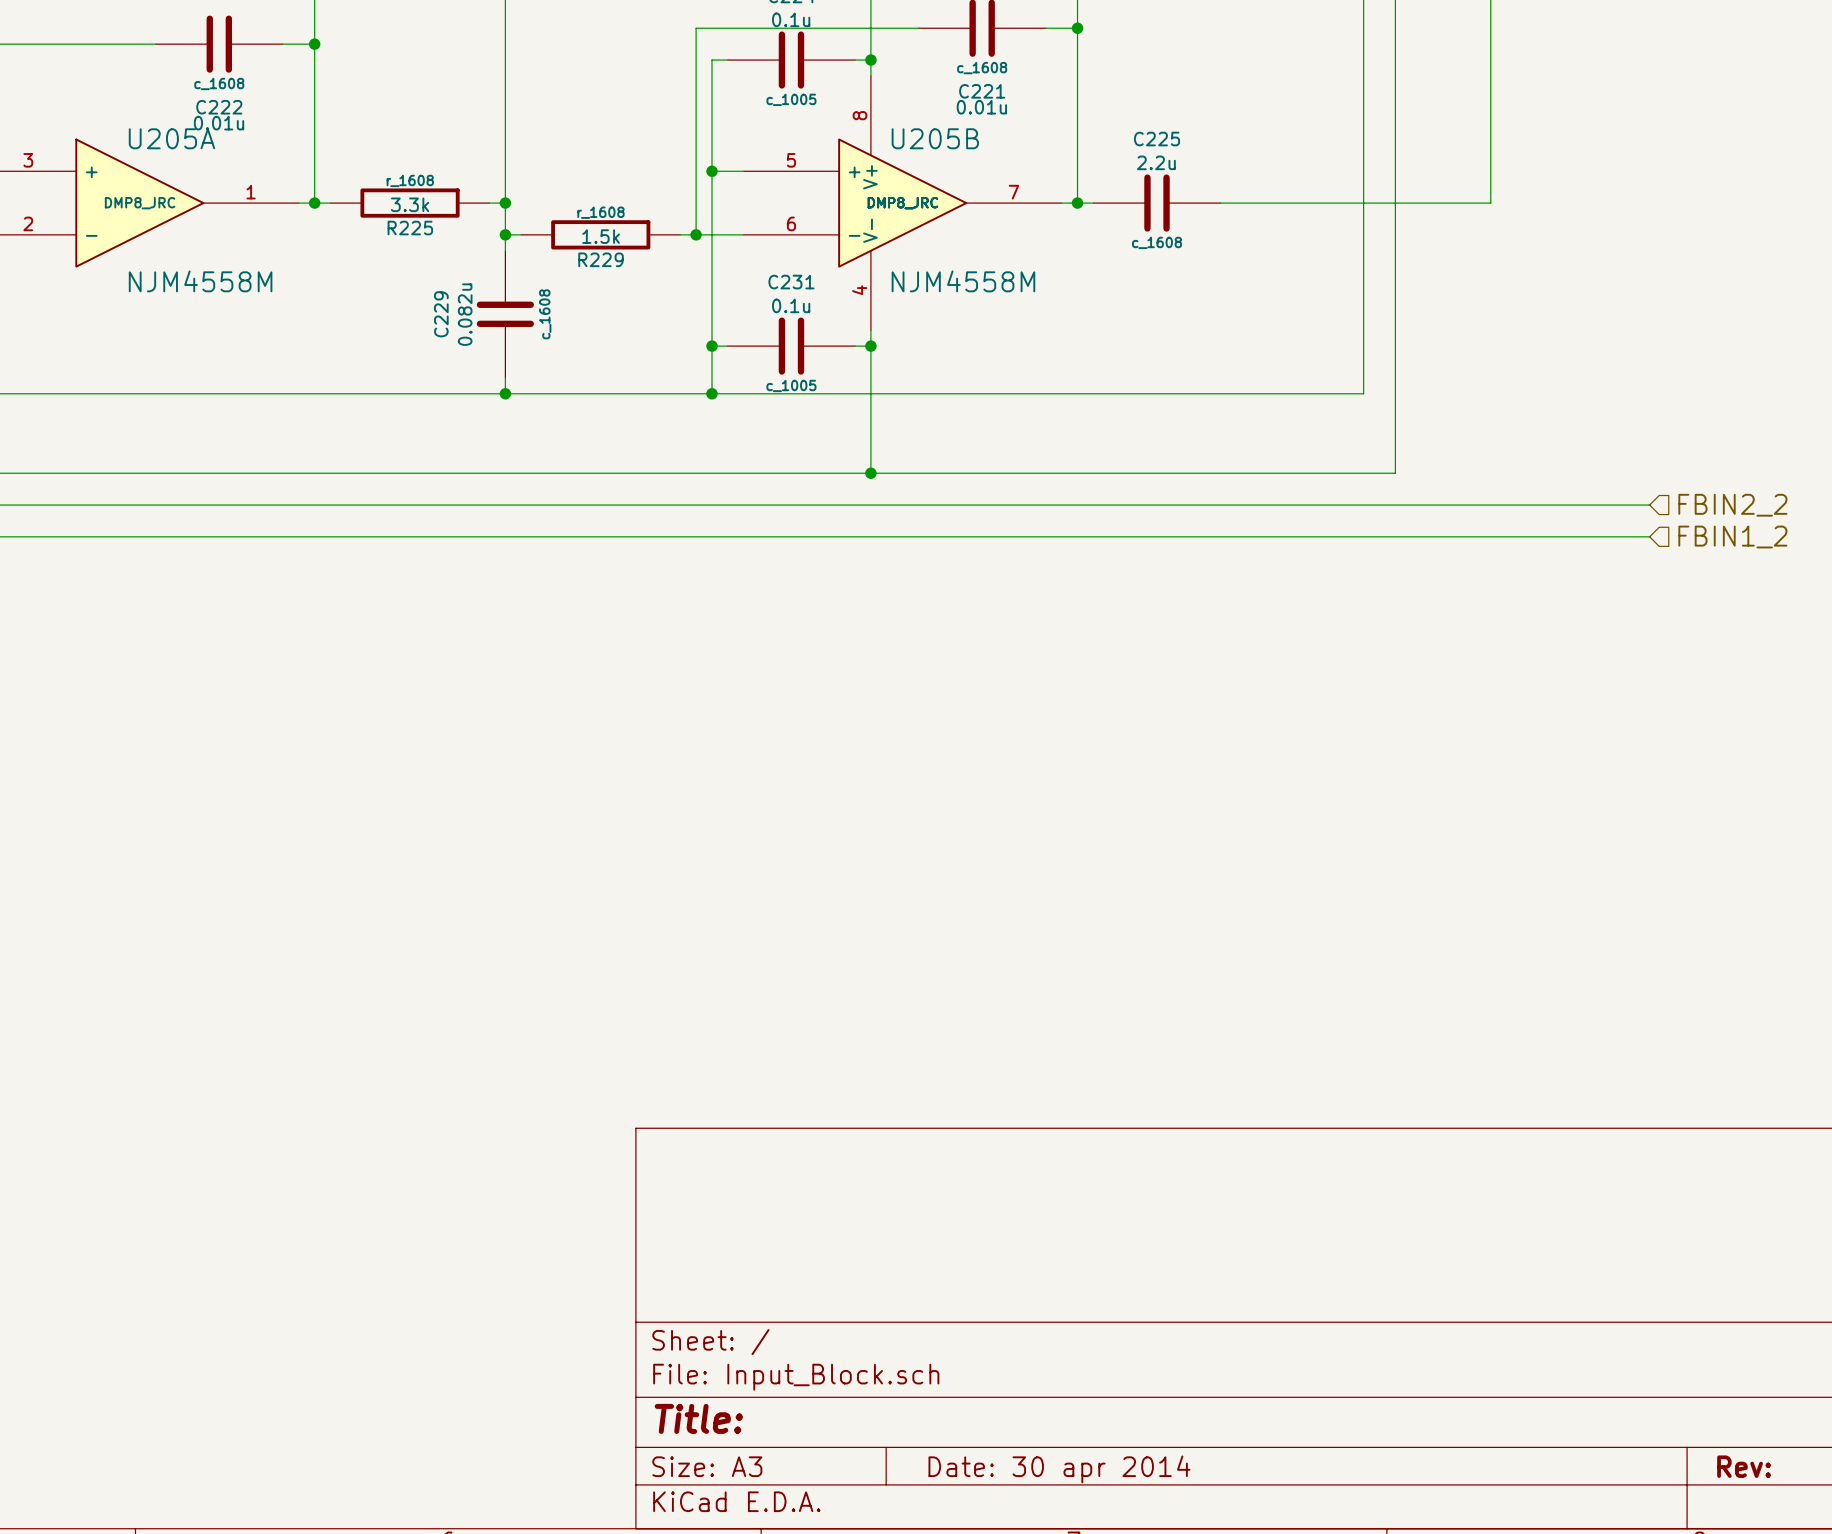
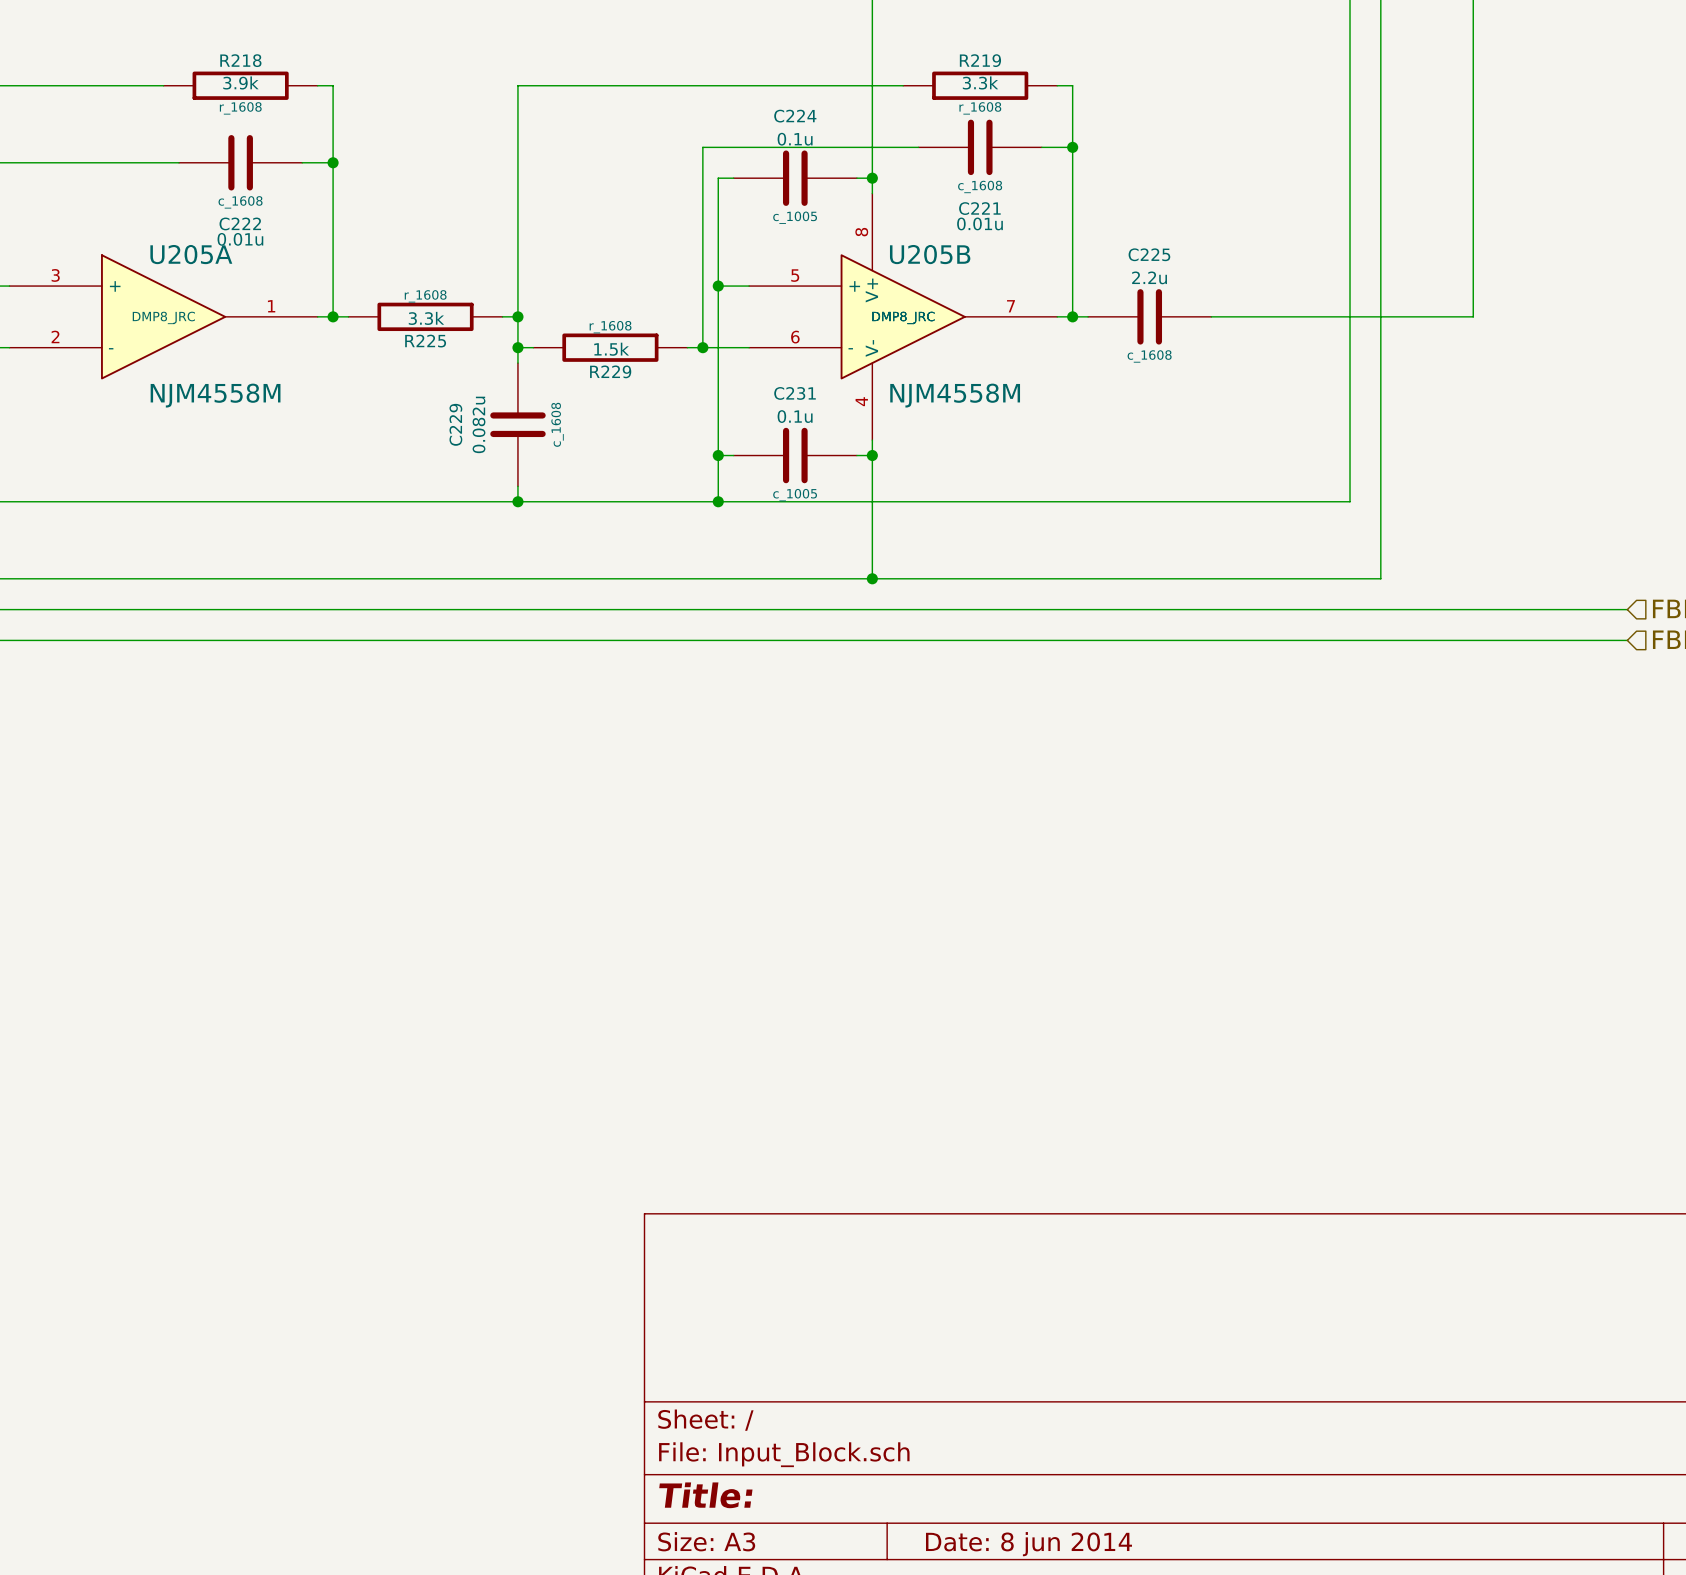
title block: Date: 30 apr 2014 (1059, 1469) -> Date: 8 jun 2014 (1028, 1544)

